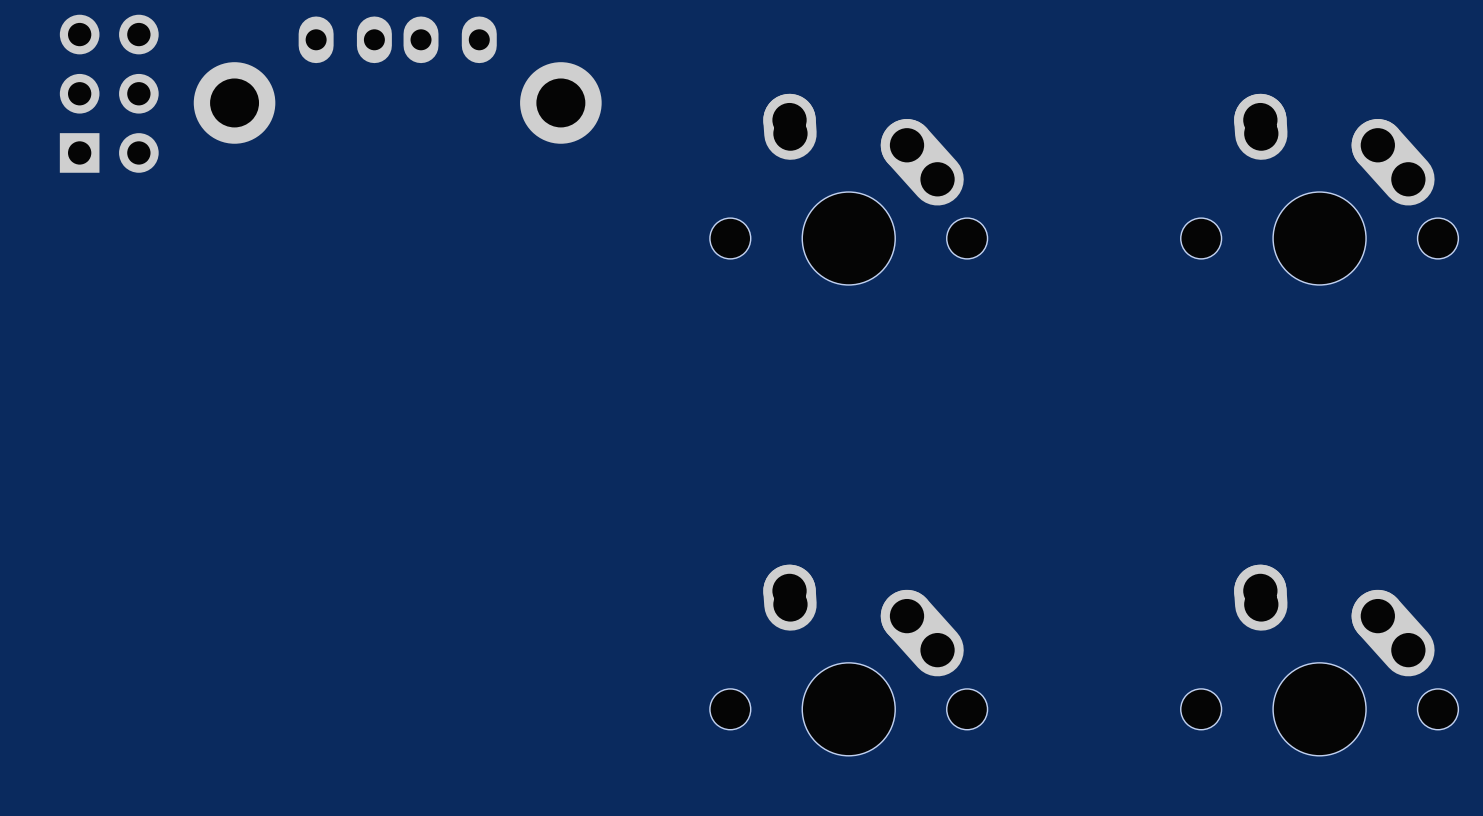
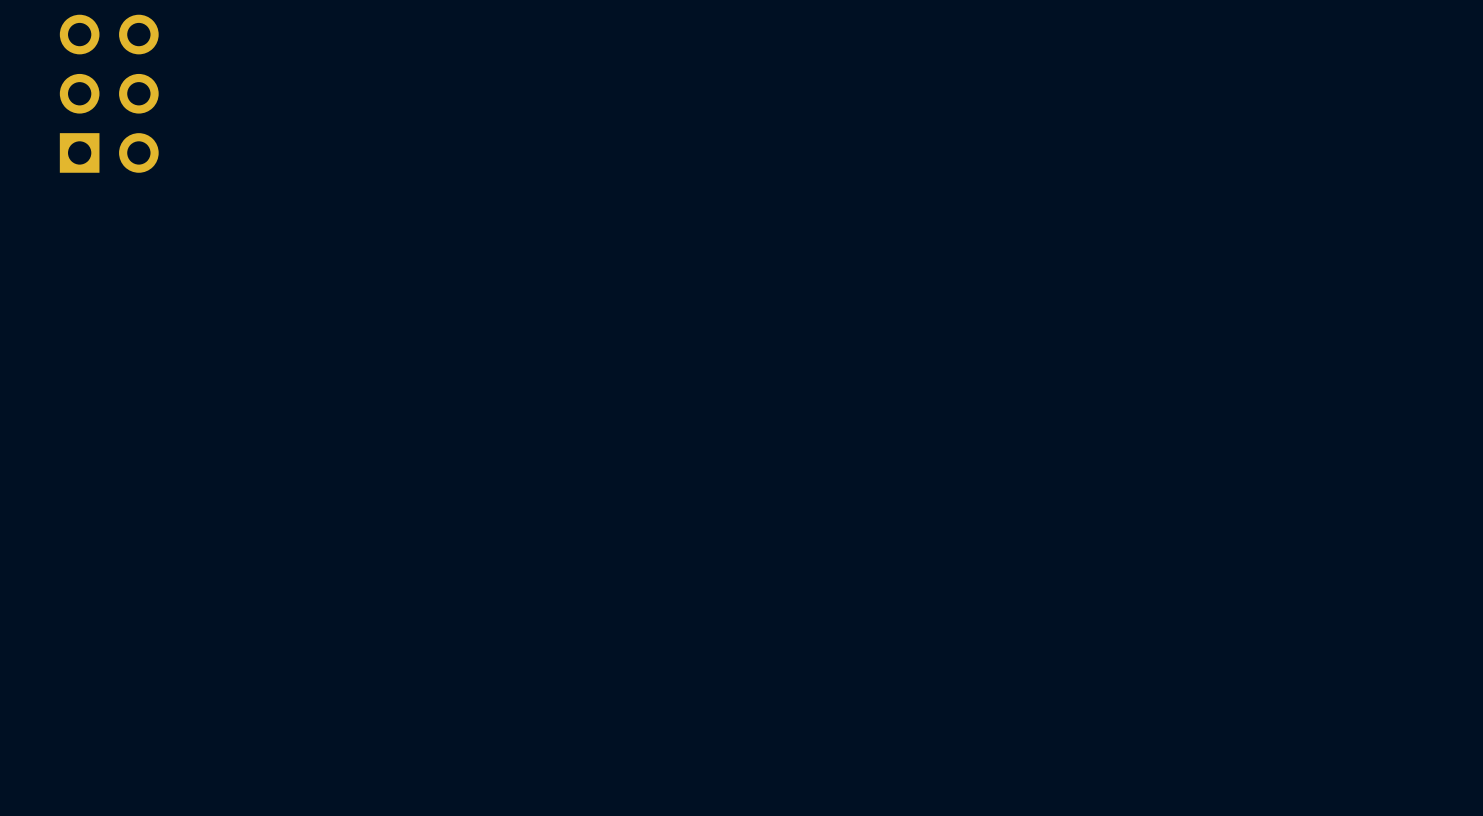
part: (397, 80) -> none
part: (848, 189) -> none
part: (1319, 189) -> none
part: (848, 660) -> none
part: (1319, 660) -> none

